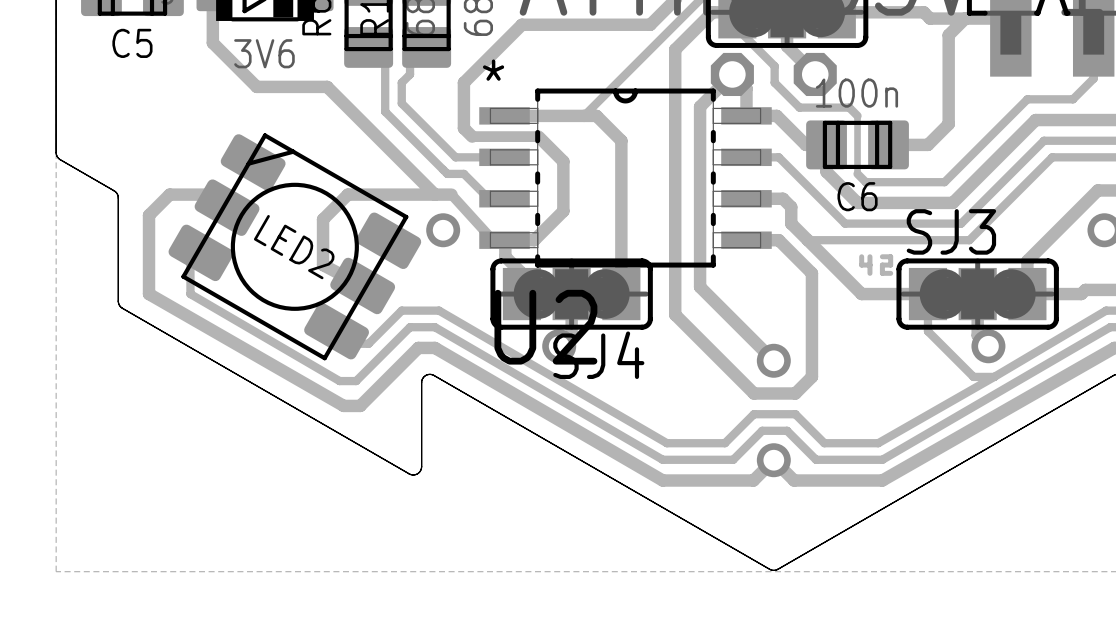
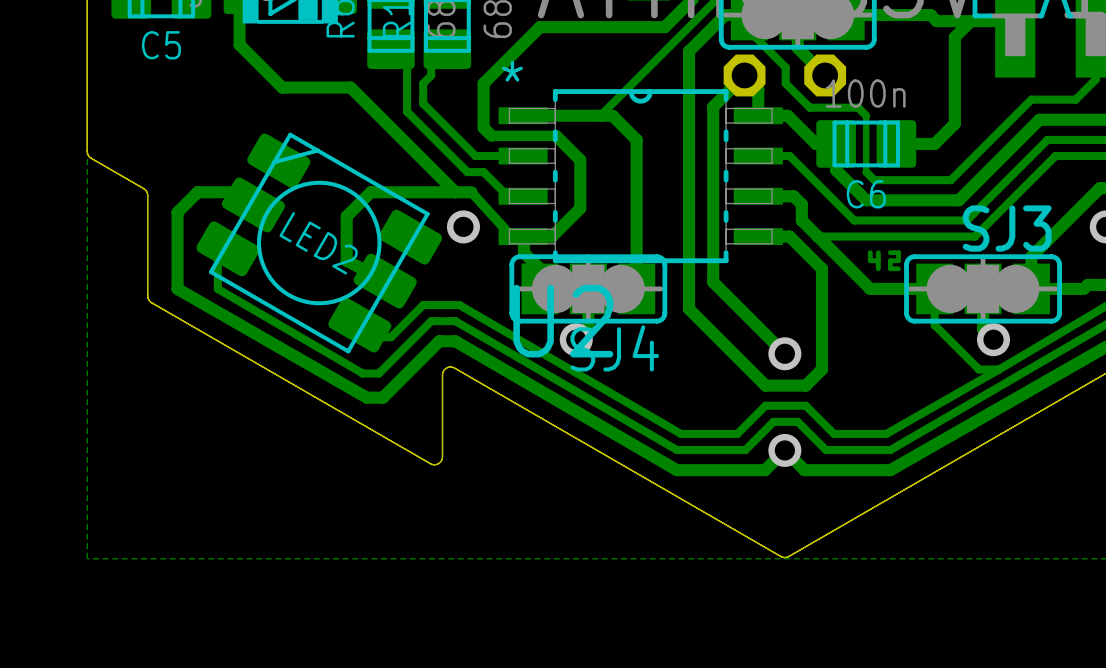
part value: 3V6 (264, 53) -> none
SJ3 name position: SJ3 (951, 231) -> SJ3 (1007, 228)

